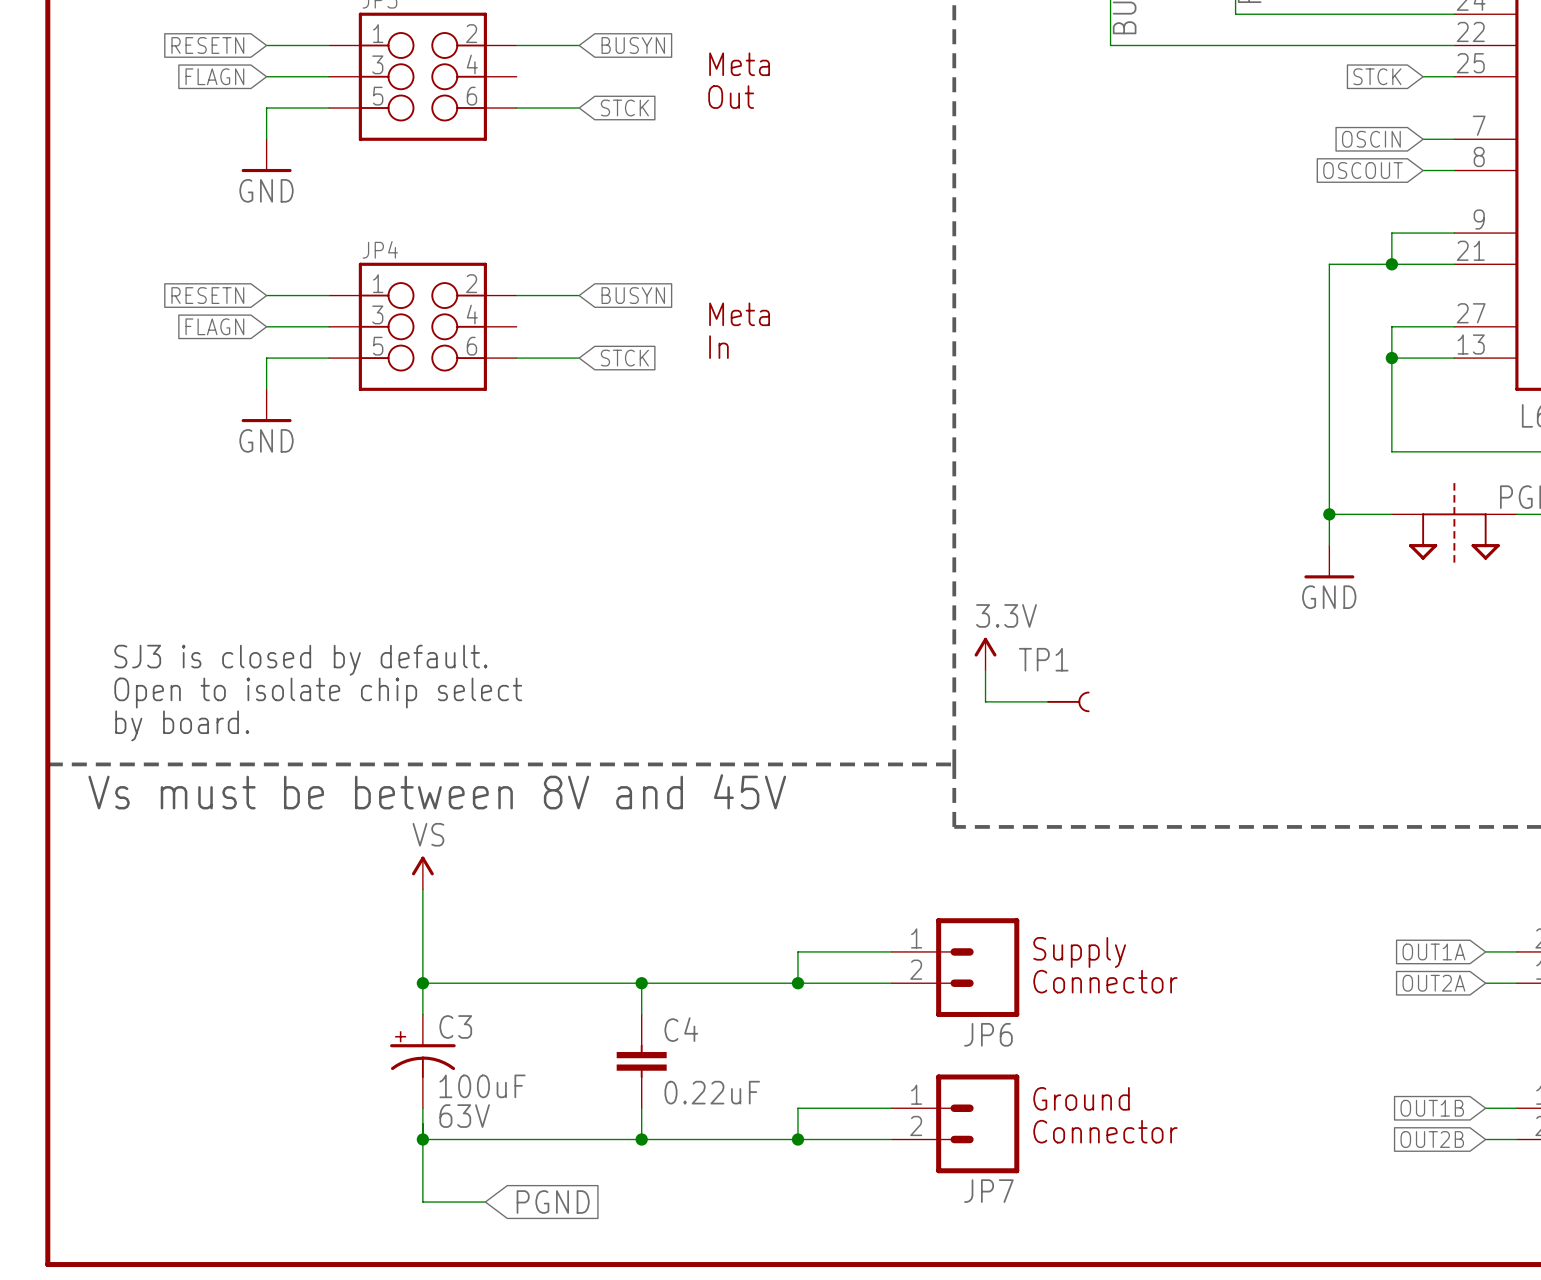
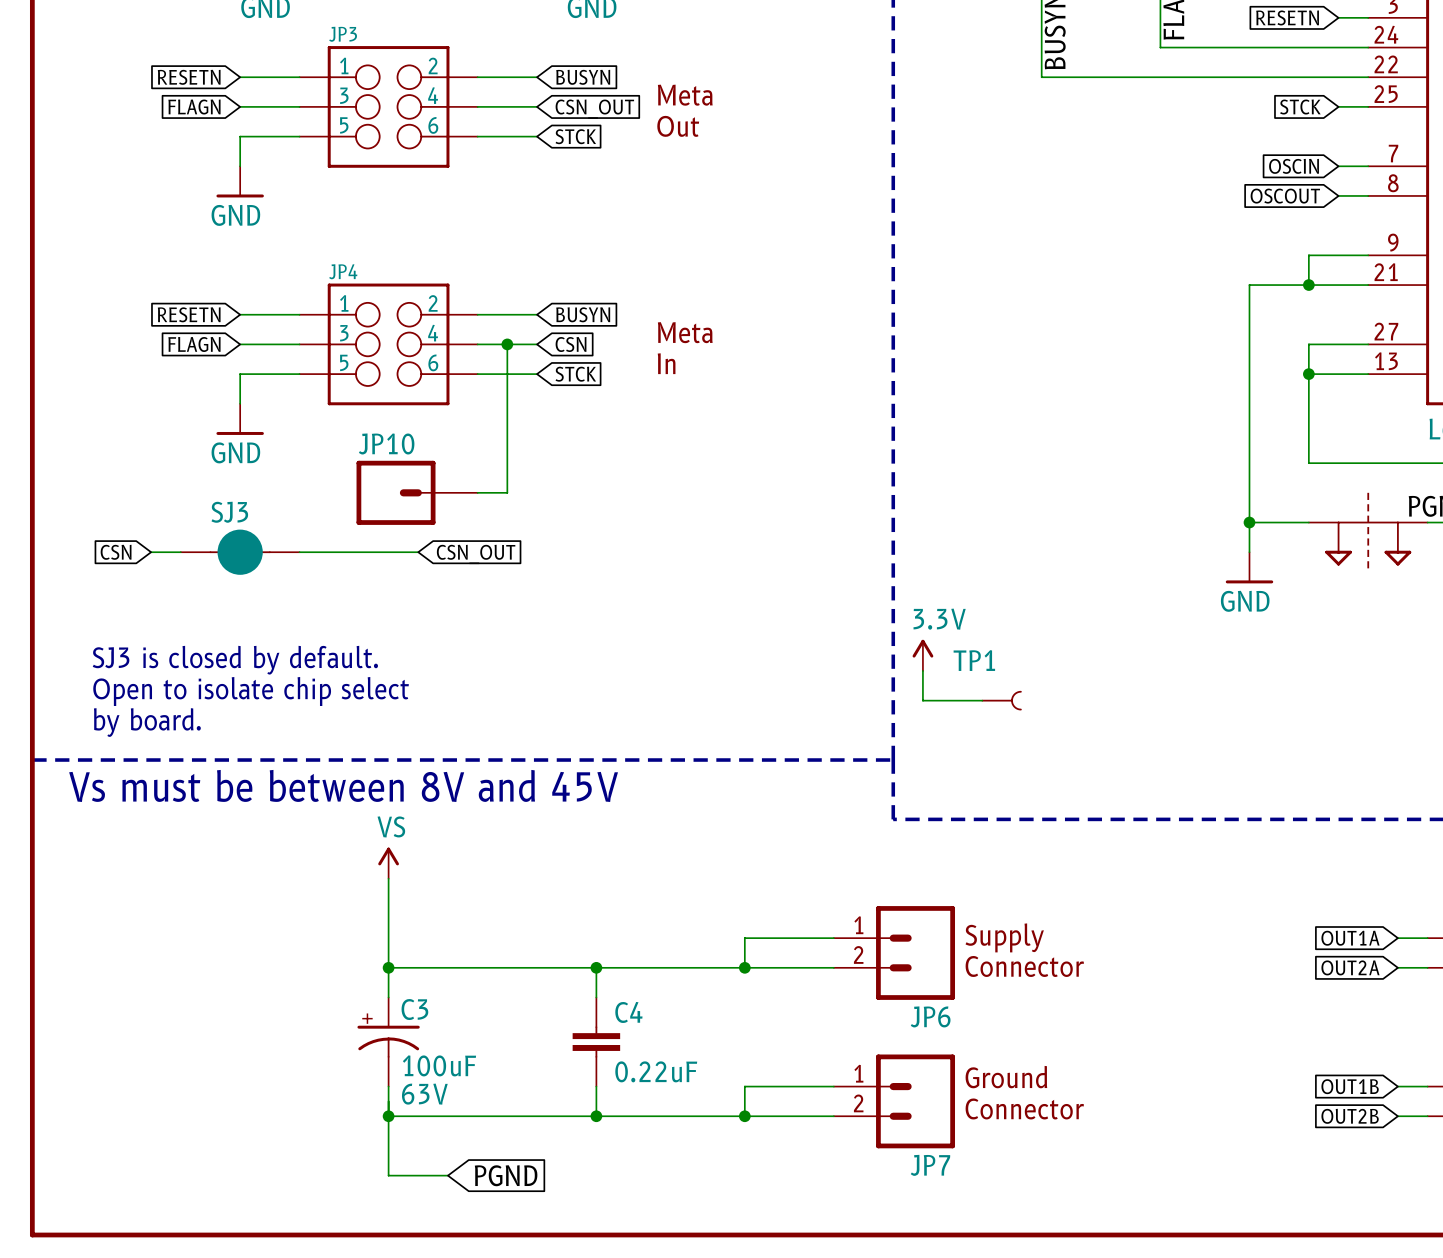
wire: none -> (477, 106) (537, 106)
global label: none -> CSN_OUT (594, 109)
wire: none -> (477, 344) (537, 344)
wire: none -> (507, 344) (507, 492) (477, 492)
junction: none -> (507, 344)
global label: none -> CSN (571, 344)
JP10: none -> (417, 492)
global label: none -> CSN (116, 552)
wire: none -> (151, 552) (180, 552)
SJ3: none -> (240, 552)
wire: none -> (299, 552) (418, 552)
global label: none -> CSN_OUT (476, 554)

